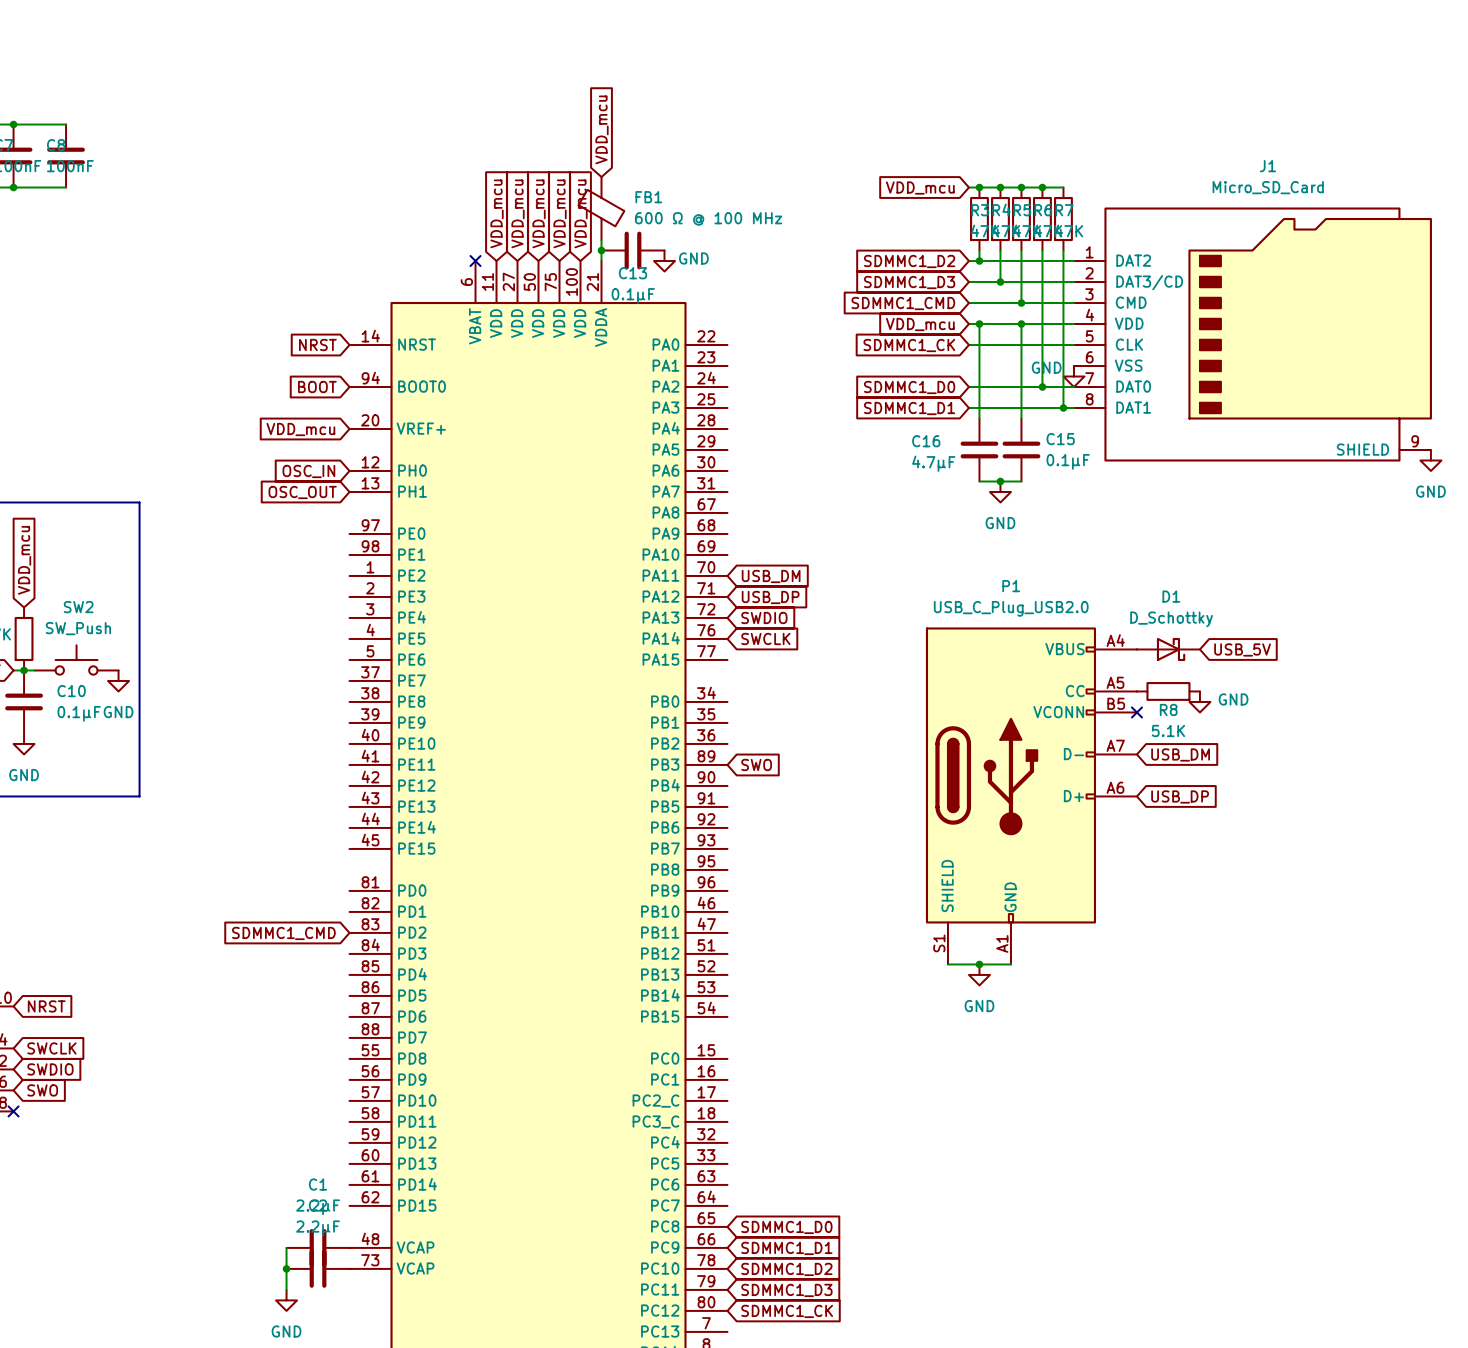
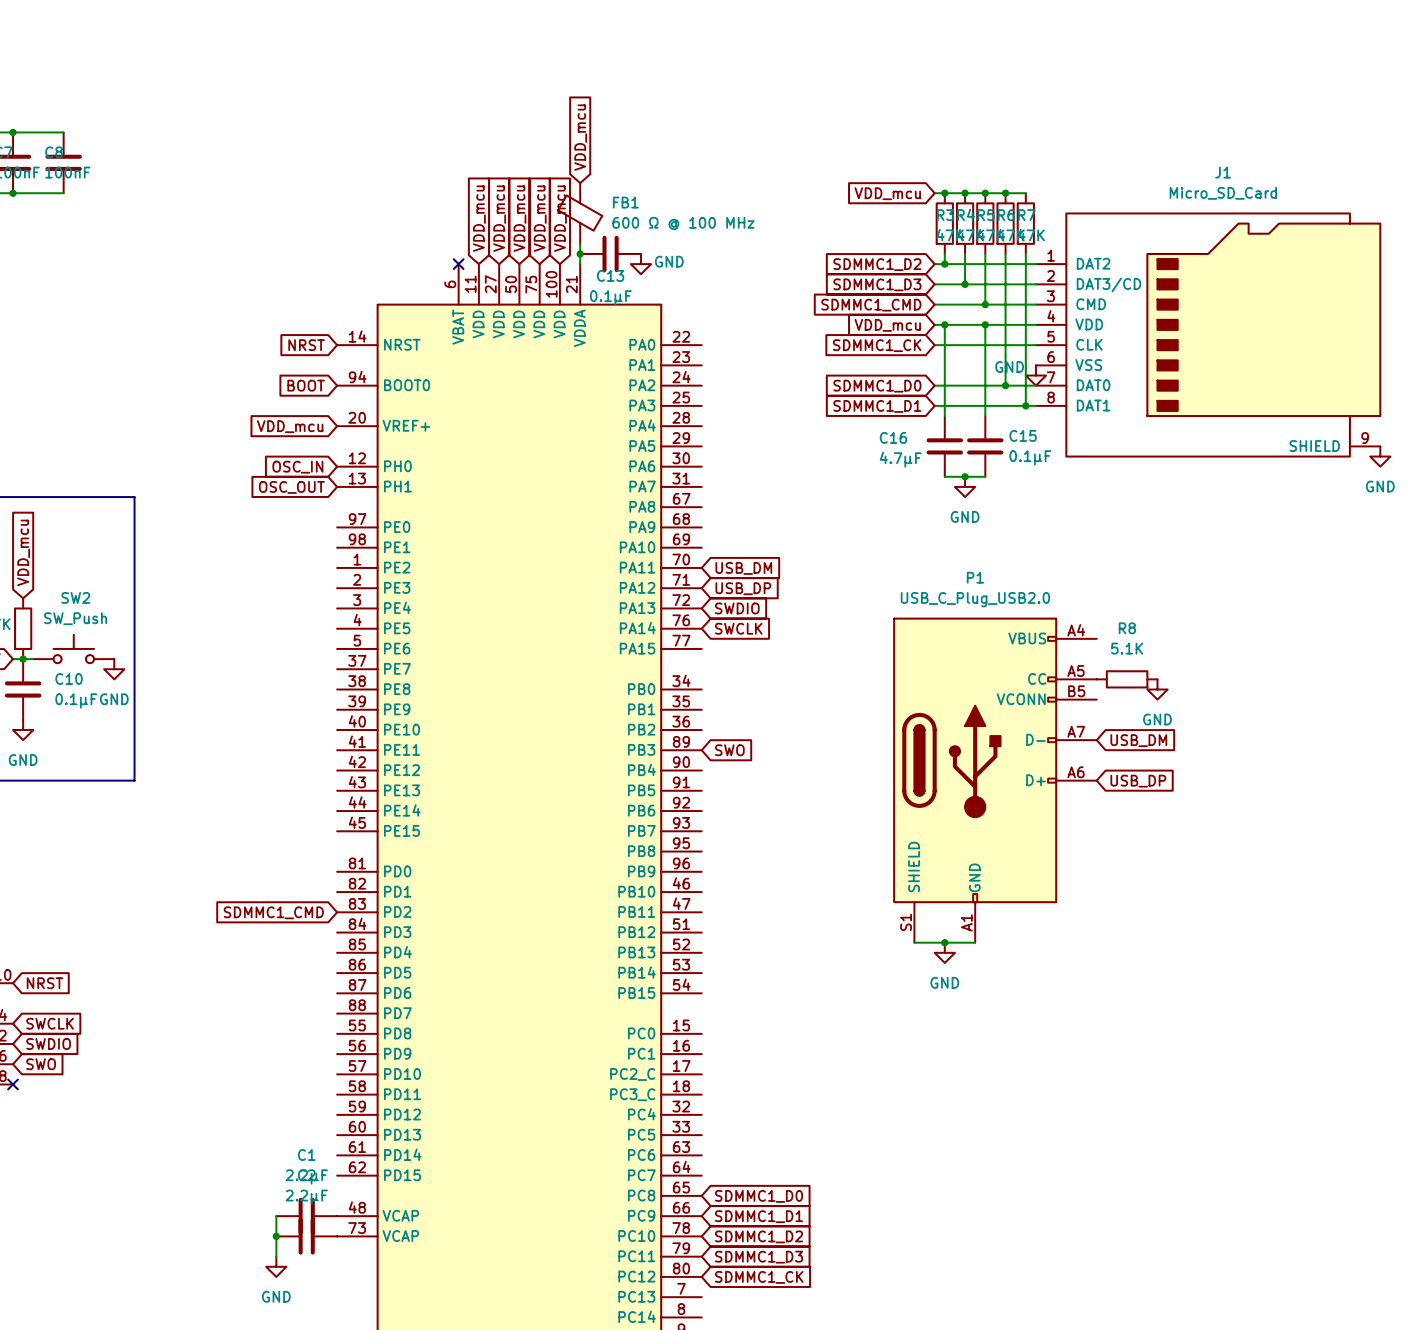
D1: D_Schottky (1168, 649) -> none
global label: USB_5V (1242, 649) -> none
power symbol text position: GND (1233, 699) -> GND (1157, 719)
R8 name position: R8 (1168, 709) -> R8 (1127, 628)
no-connect mark: (1136, 712) -> none
R8 value position: 5.1K (1168, 730) -> 5.1K (1127, 648)

